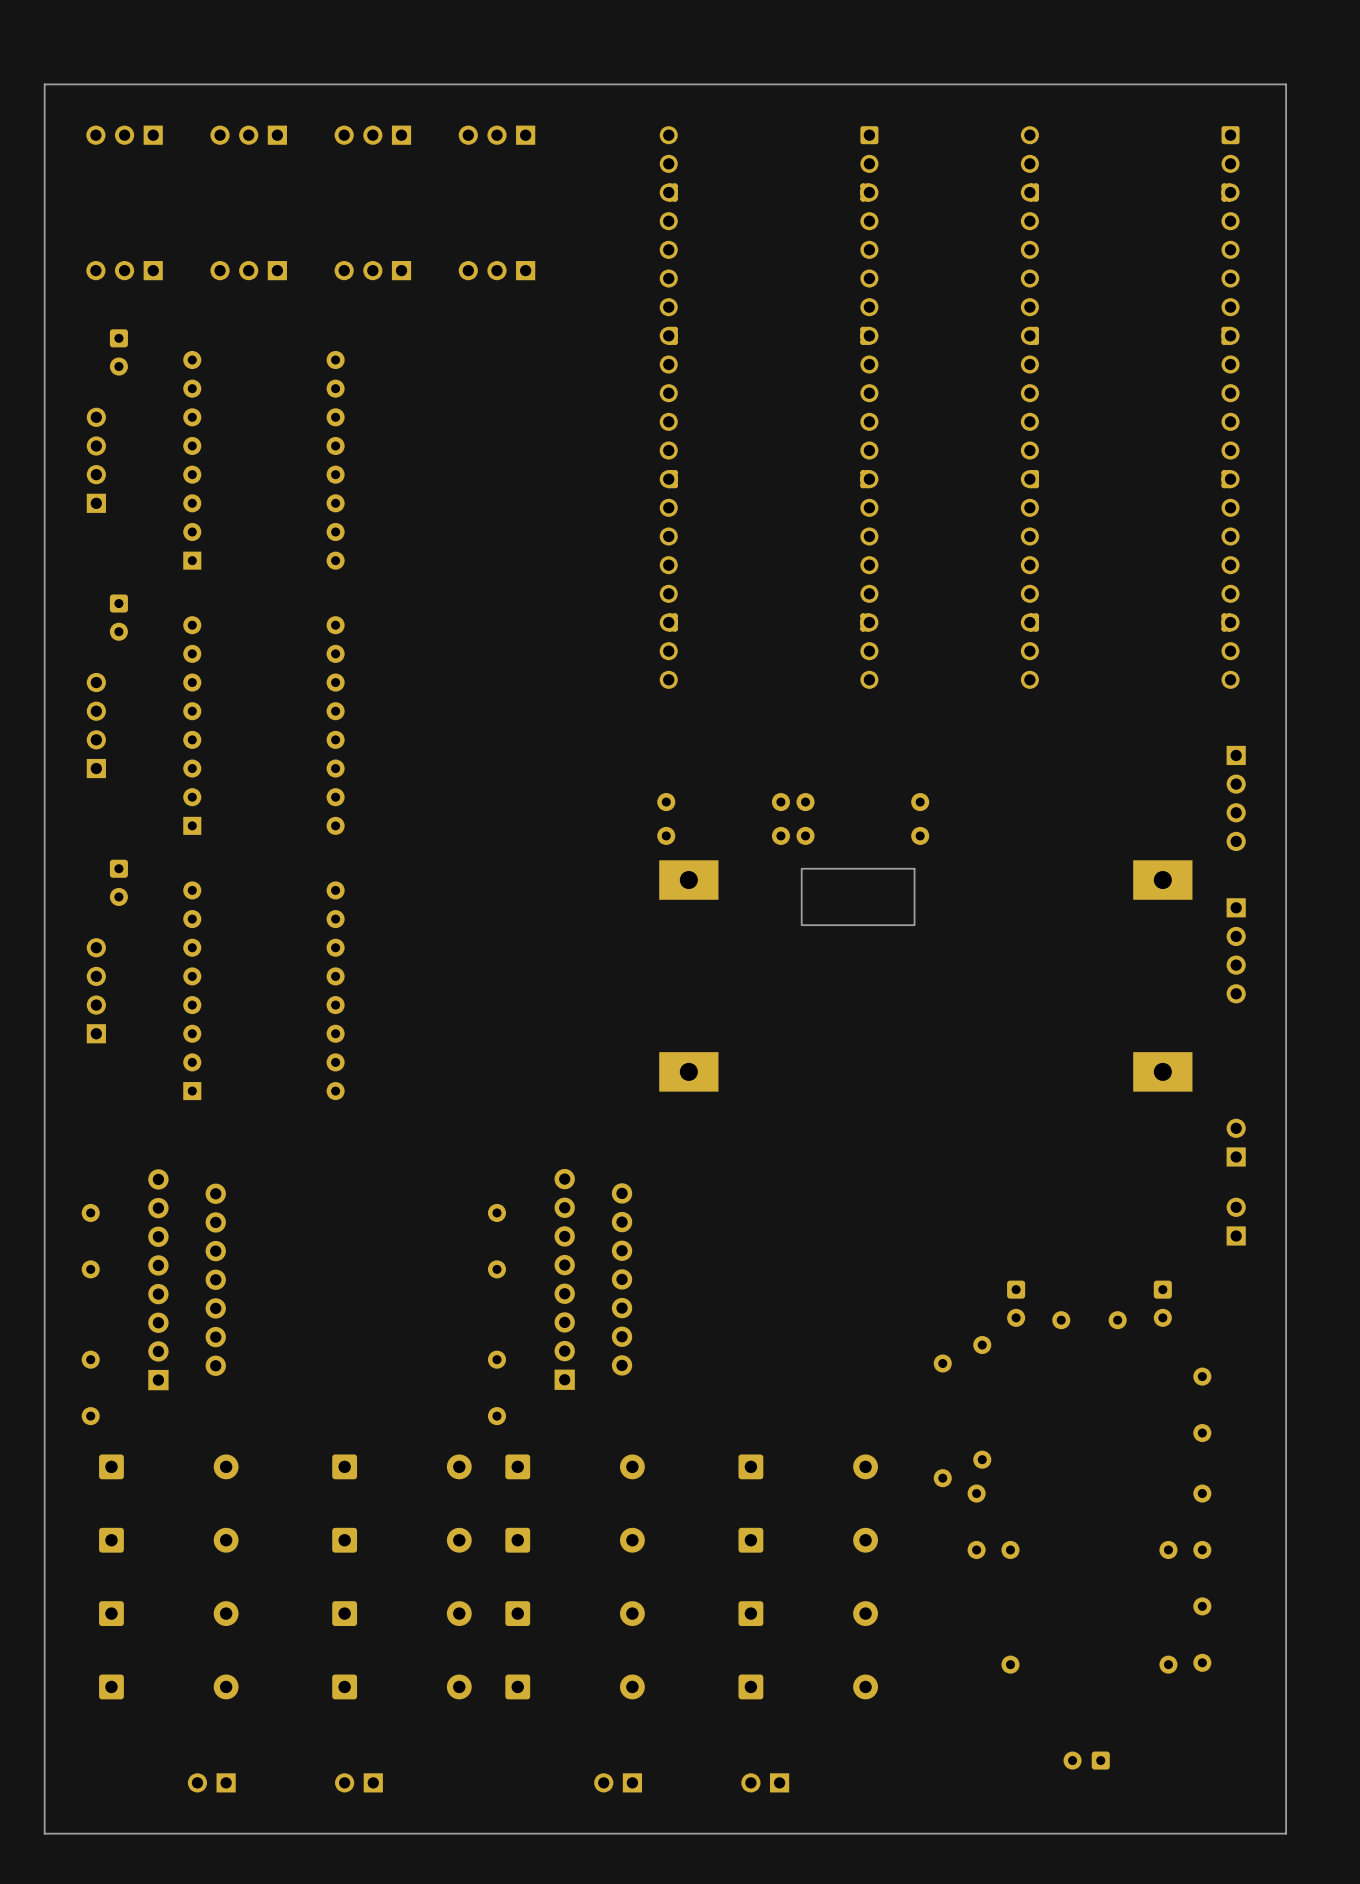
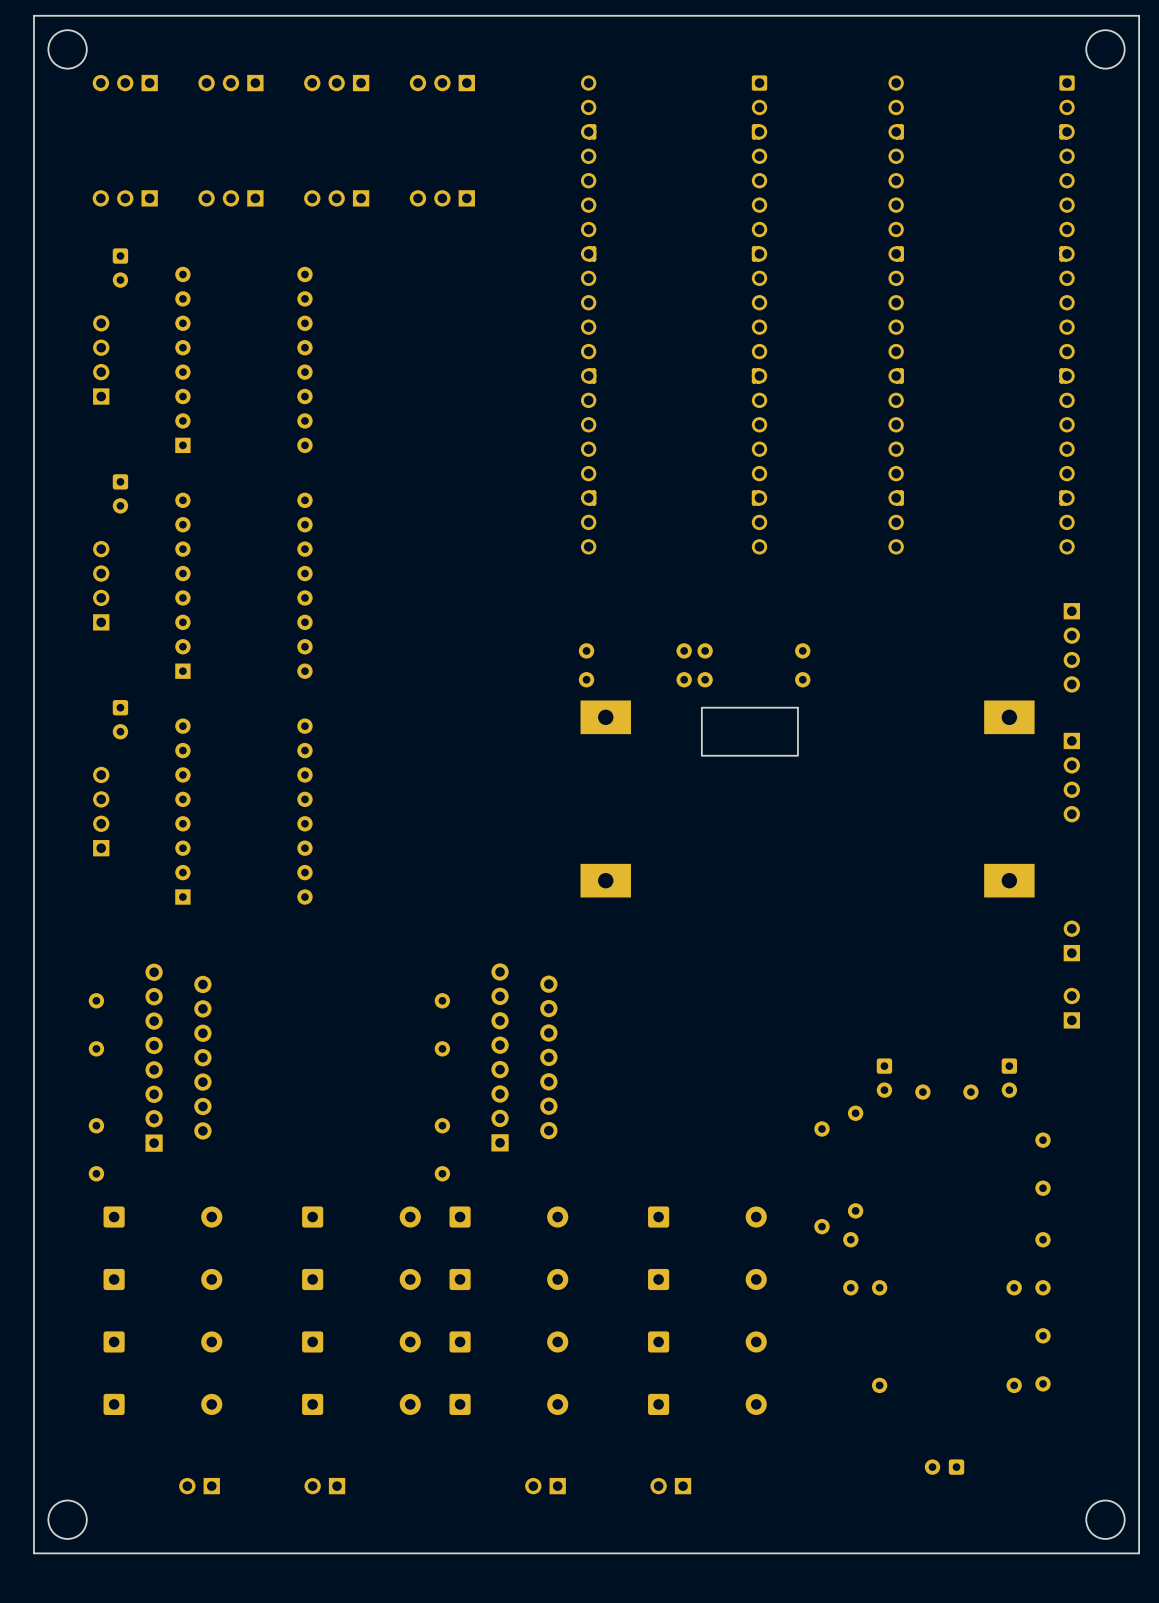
round board edge: none -> [48, 29, 88, 69]
round board edge: none -> [1086, 29, 1125, 69]
board edge: (1286, 84) (44, 84) (44, 1833) (1286, 1833) (1286, 84) -> (1139, 15) (1139, 1553) (33, 1553) (33, 15) (1139, 15)
round board edge: none -> [48, 1500, 88, 1540]
round board edge: none -> [1086, 1500, 1125, 1540]

